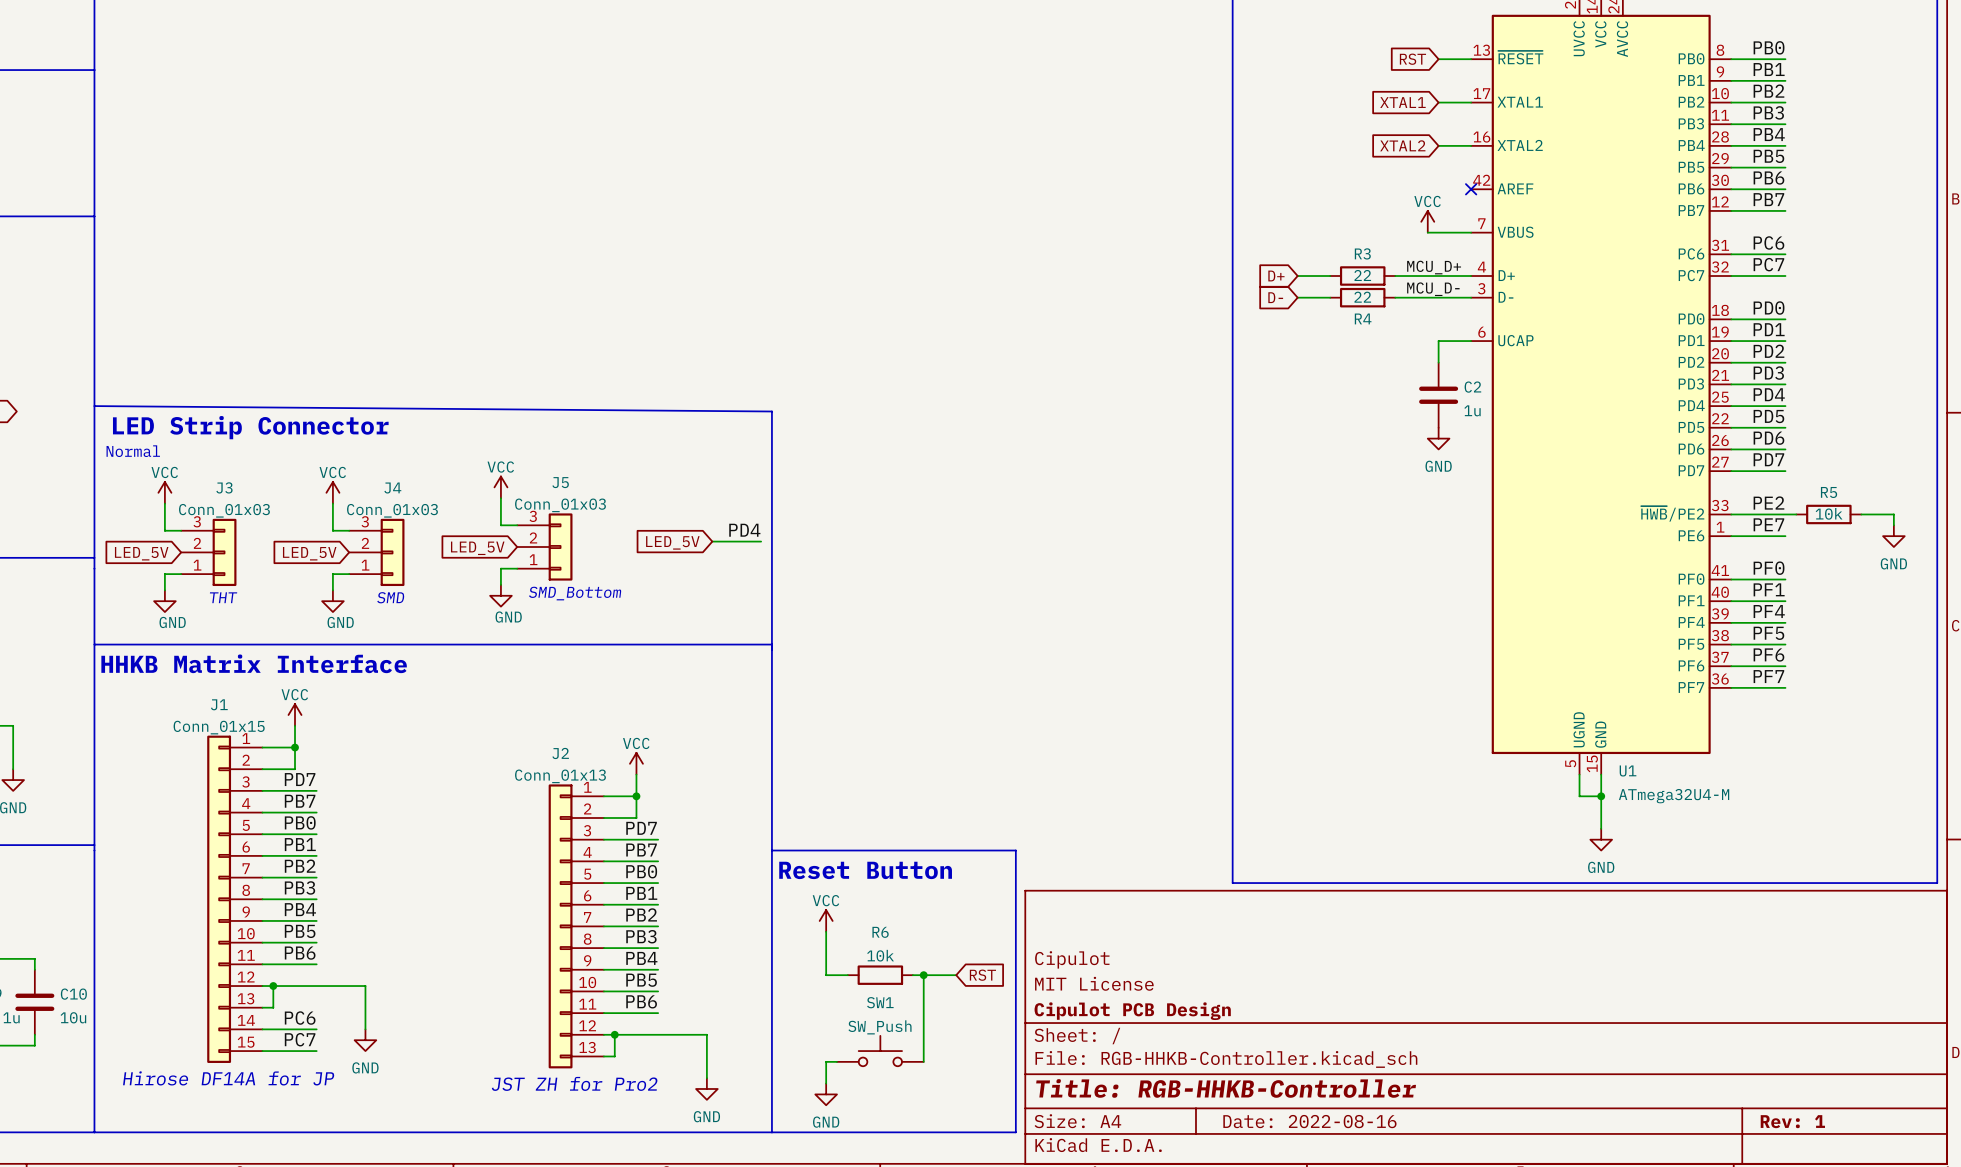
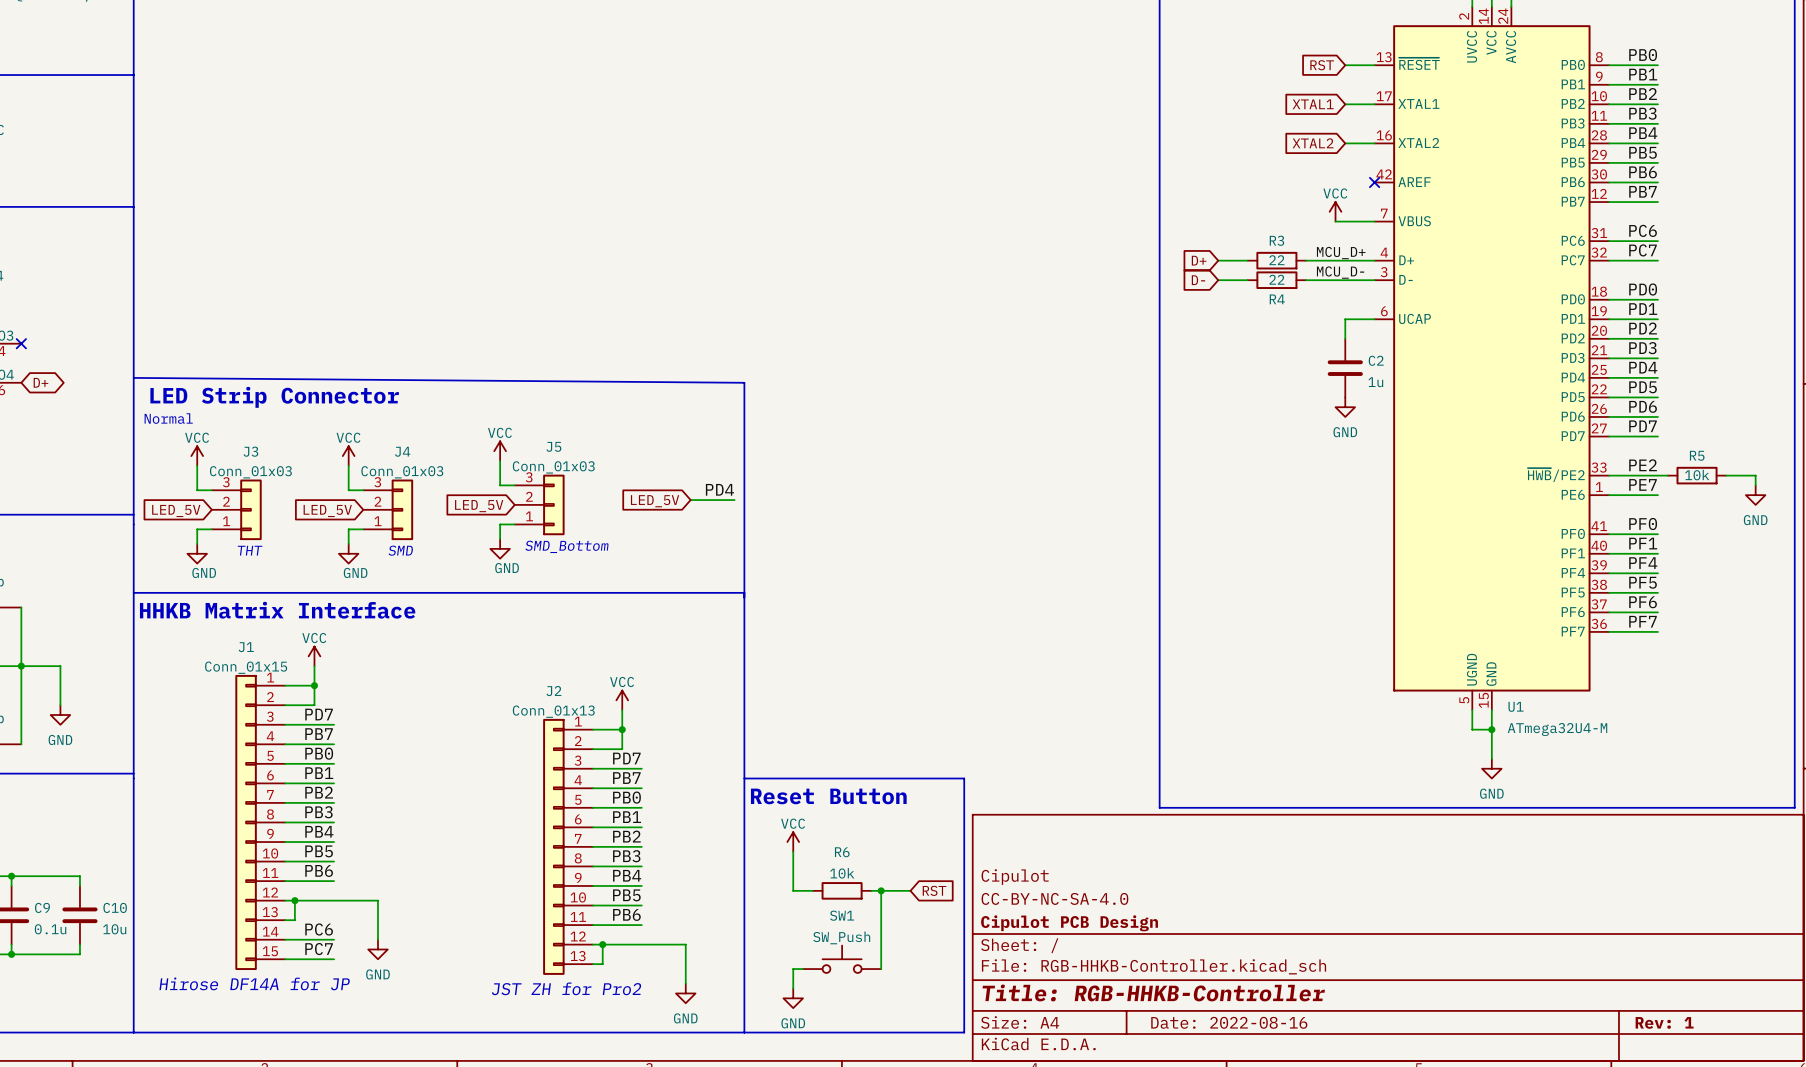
title block: MIT License (1094, 983) -> CC-BY-NC-SA-4.0 (1054, 898)

